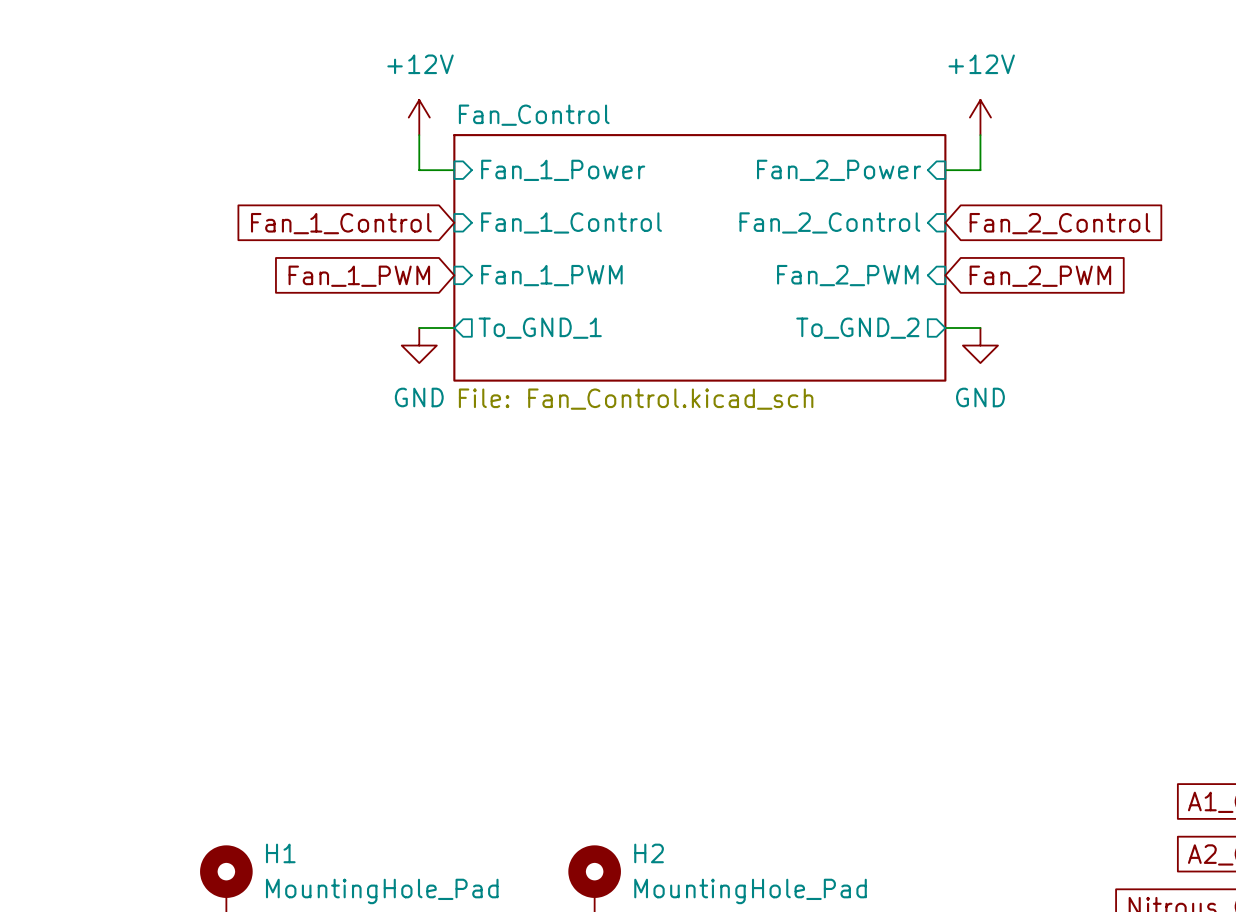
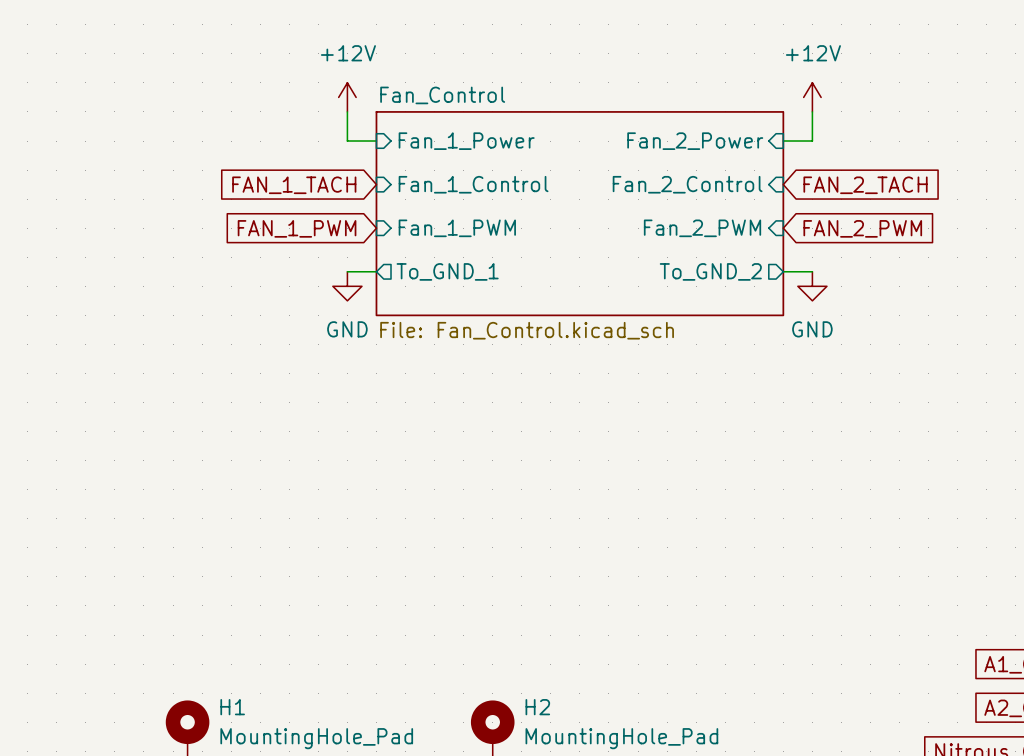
global label: Fan_1_Control (341, 223) -> FAN_1_TACH (294, 185)
global label: Fan_2_Control (1060, 223) -> FAN_2_TACH (865, 185)
global label: Fan_1_PWM (359, 276) -> FAN_1_PWM (297, 228)
global label: Fan_2_PWM (1040, 276) -> FAN_2_PWM (862, 228)

